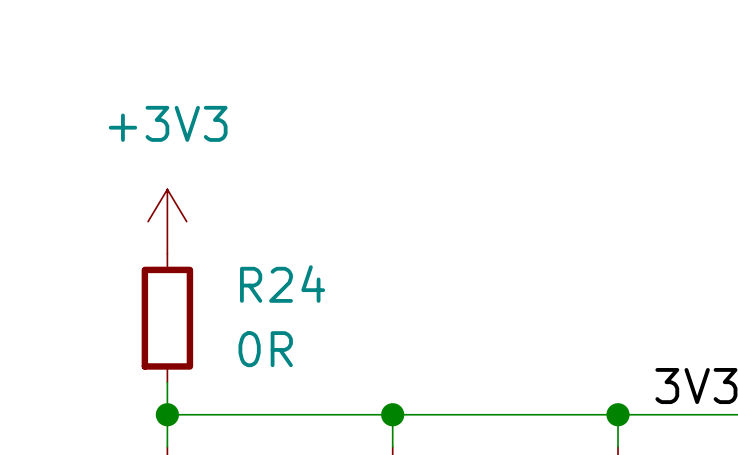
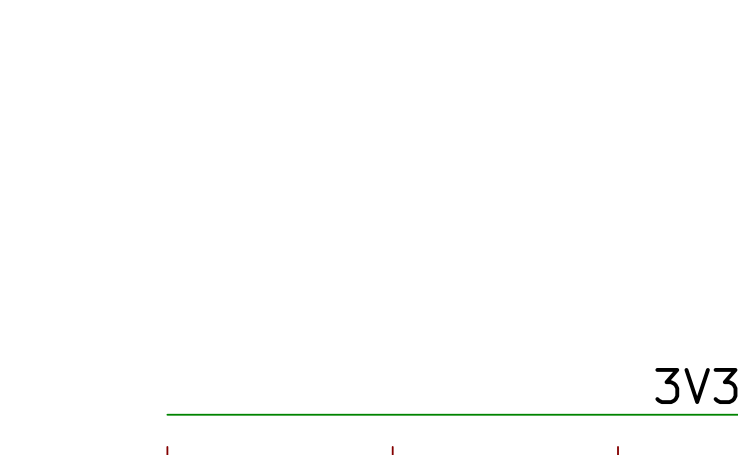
power symbol: +3V3 (167, 221) -> none
R24: (167, 318) -> none
wire: (167, 382) (167, 446) -> none
junction: (167, 414) -> none
wire: (392, 414) (392, 446) -> none
junction: (392, 414) -> none
wire: (618, 414) (618, 446) -> none
junction: (618, 414) -> none

